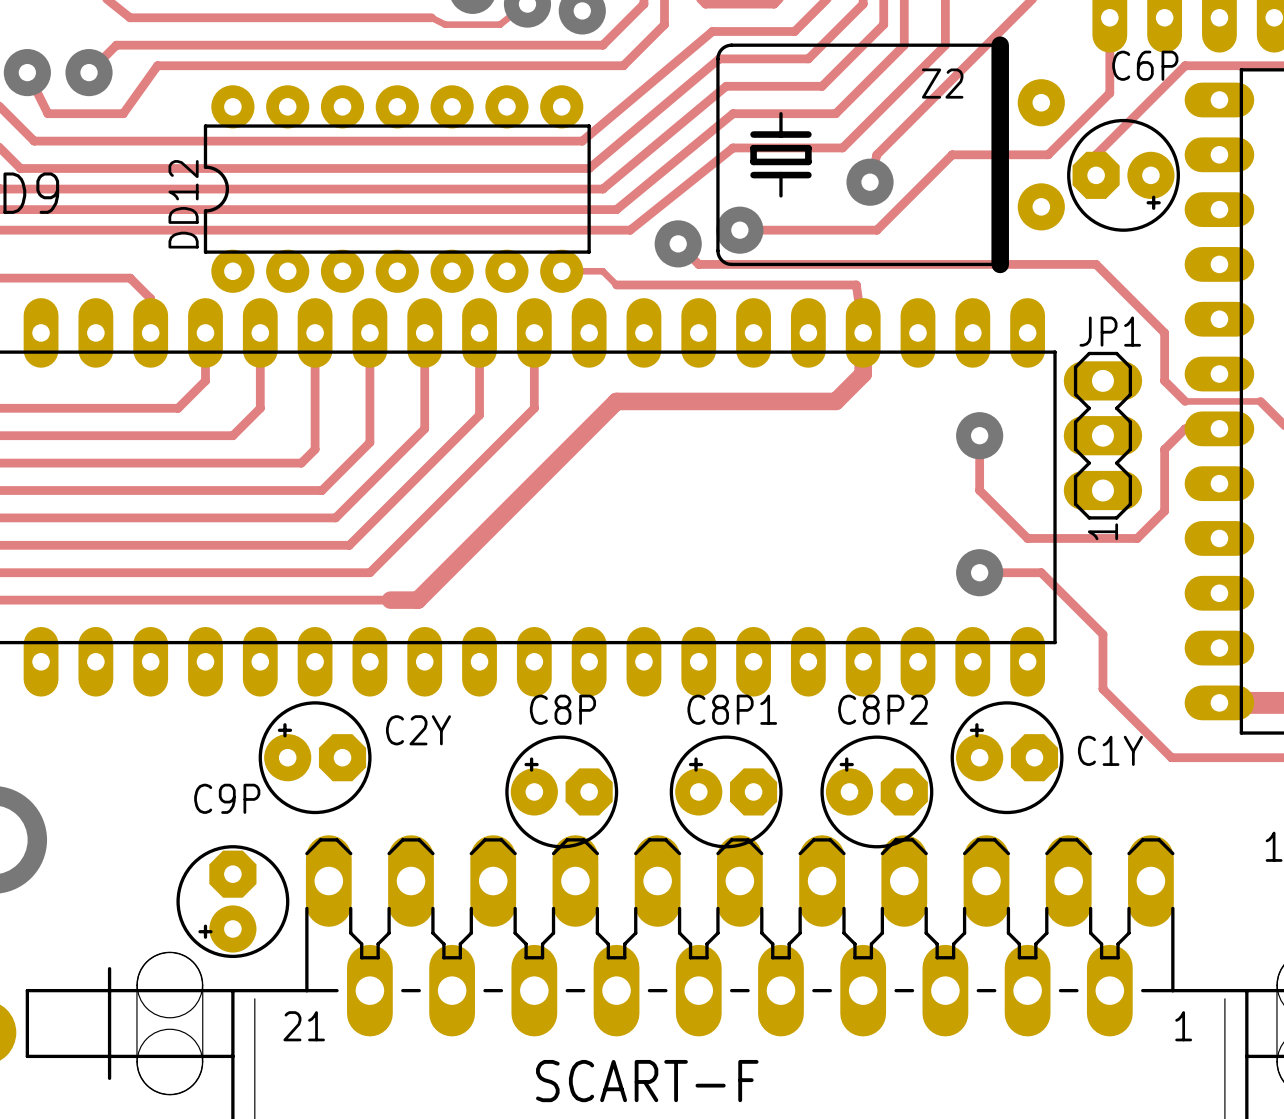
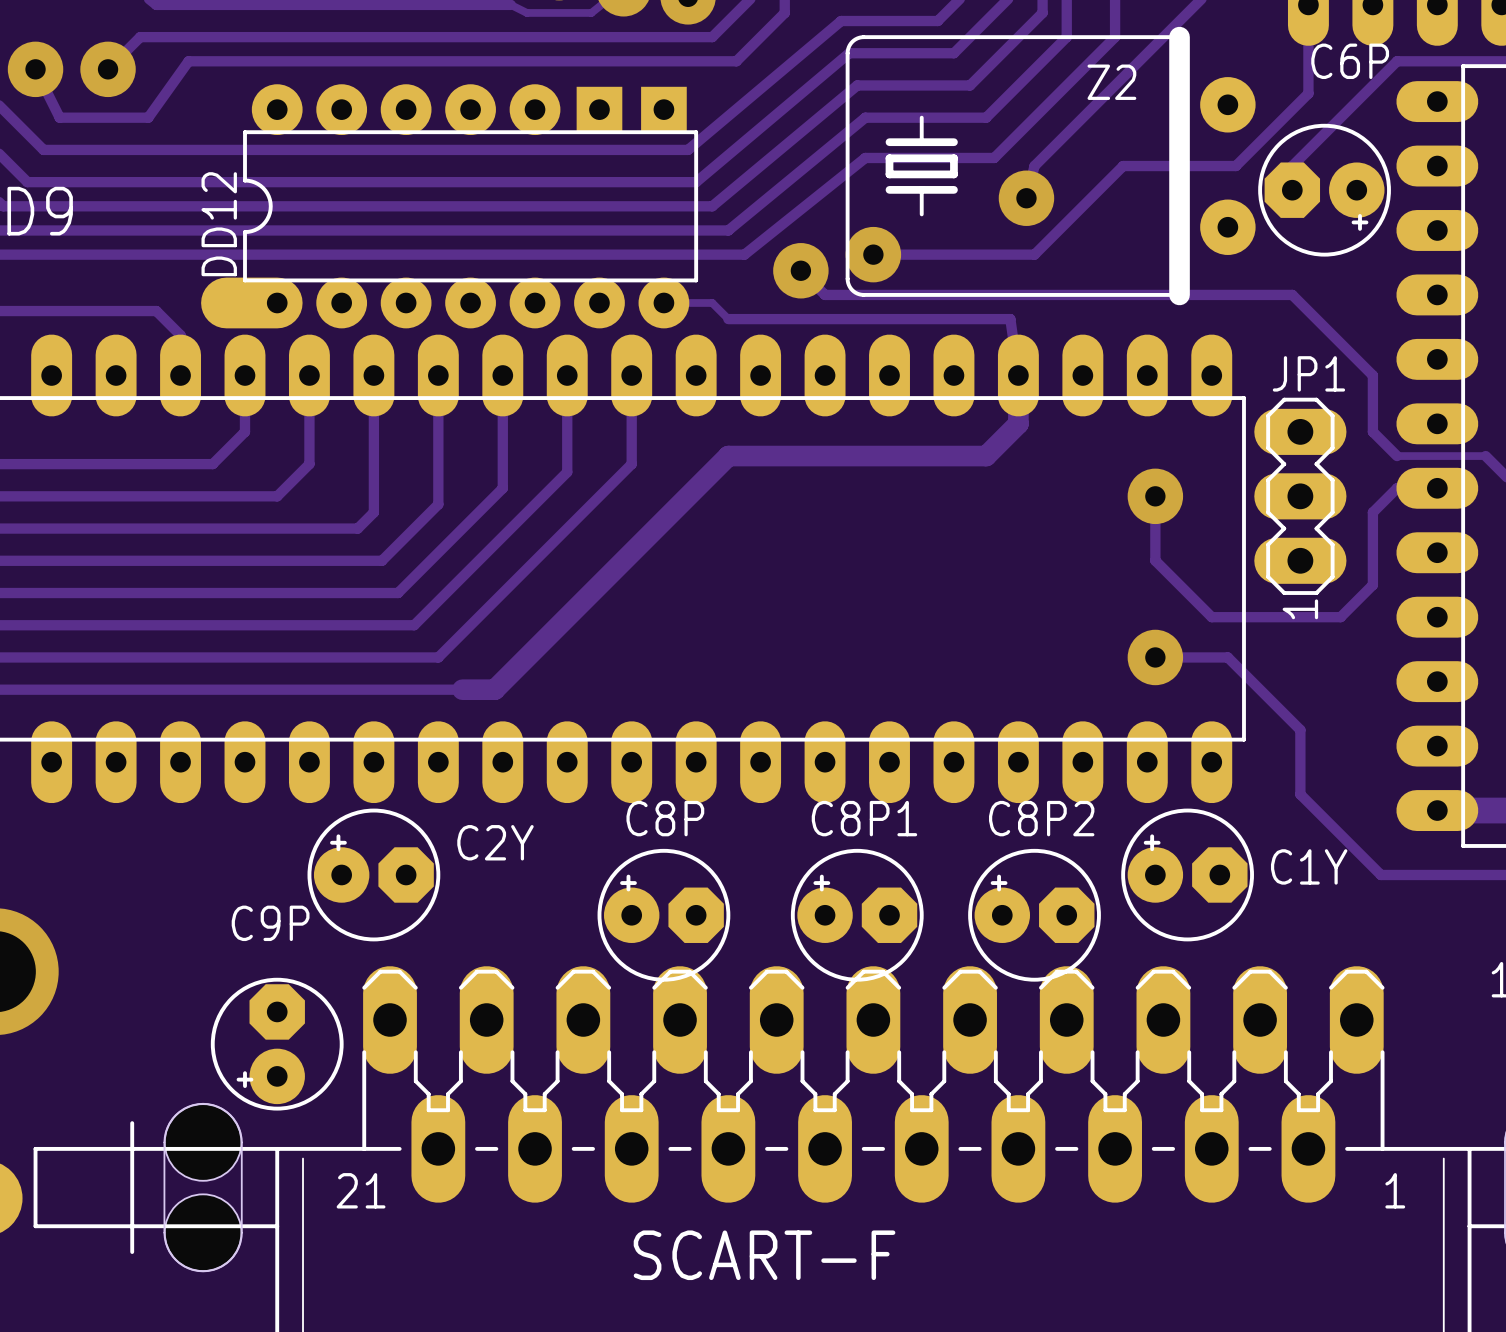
DD12 footprint: [203, 85, 591, 293] -> [201, 84, 699, 329]

